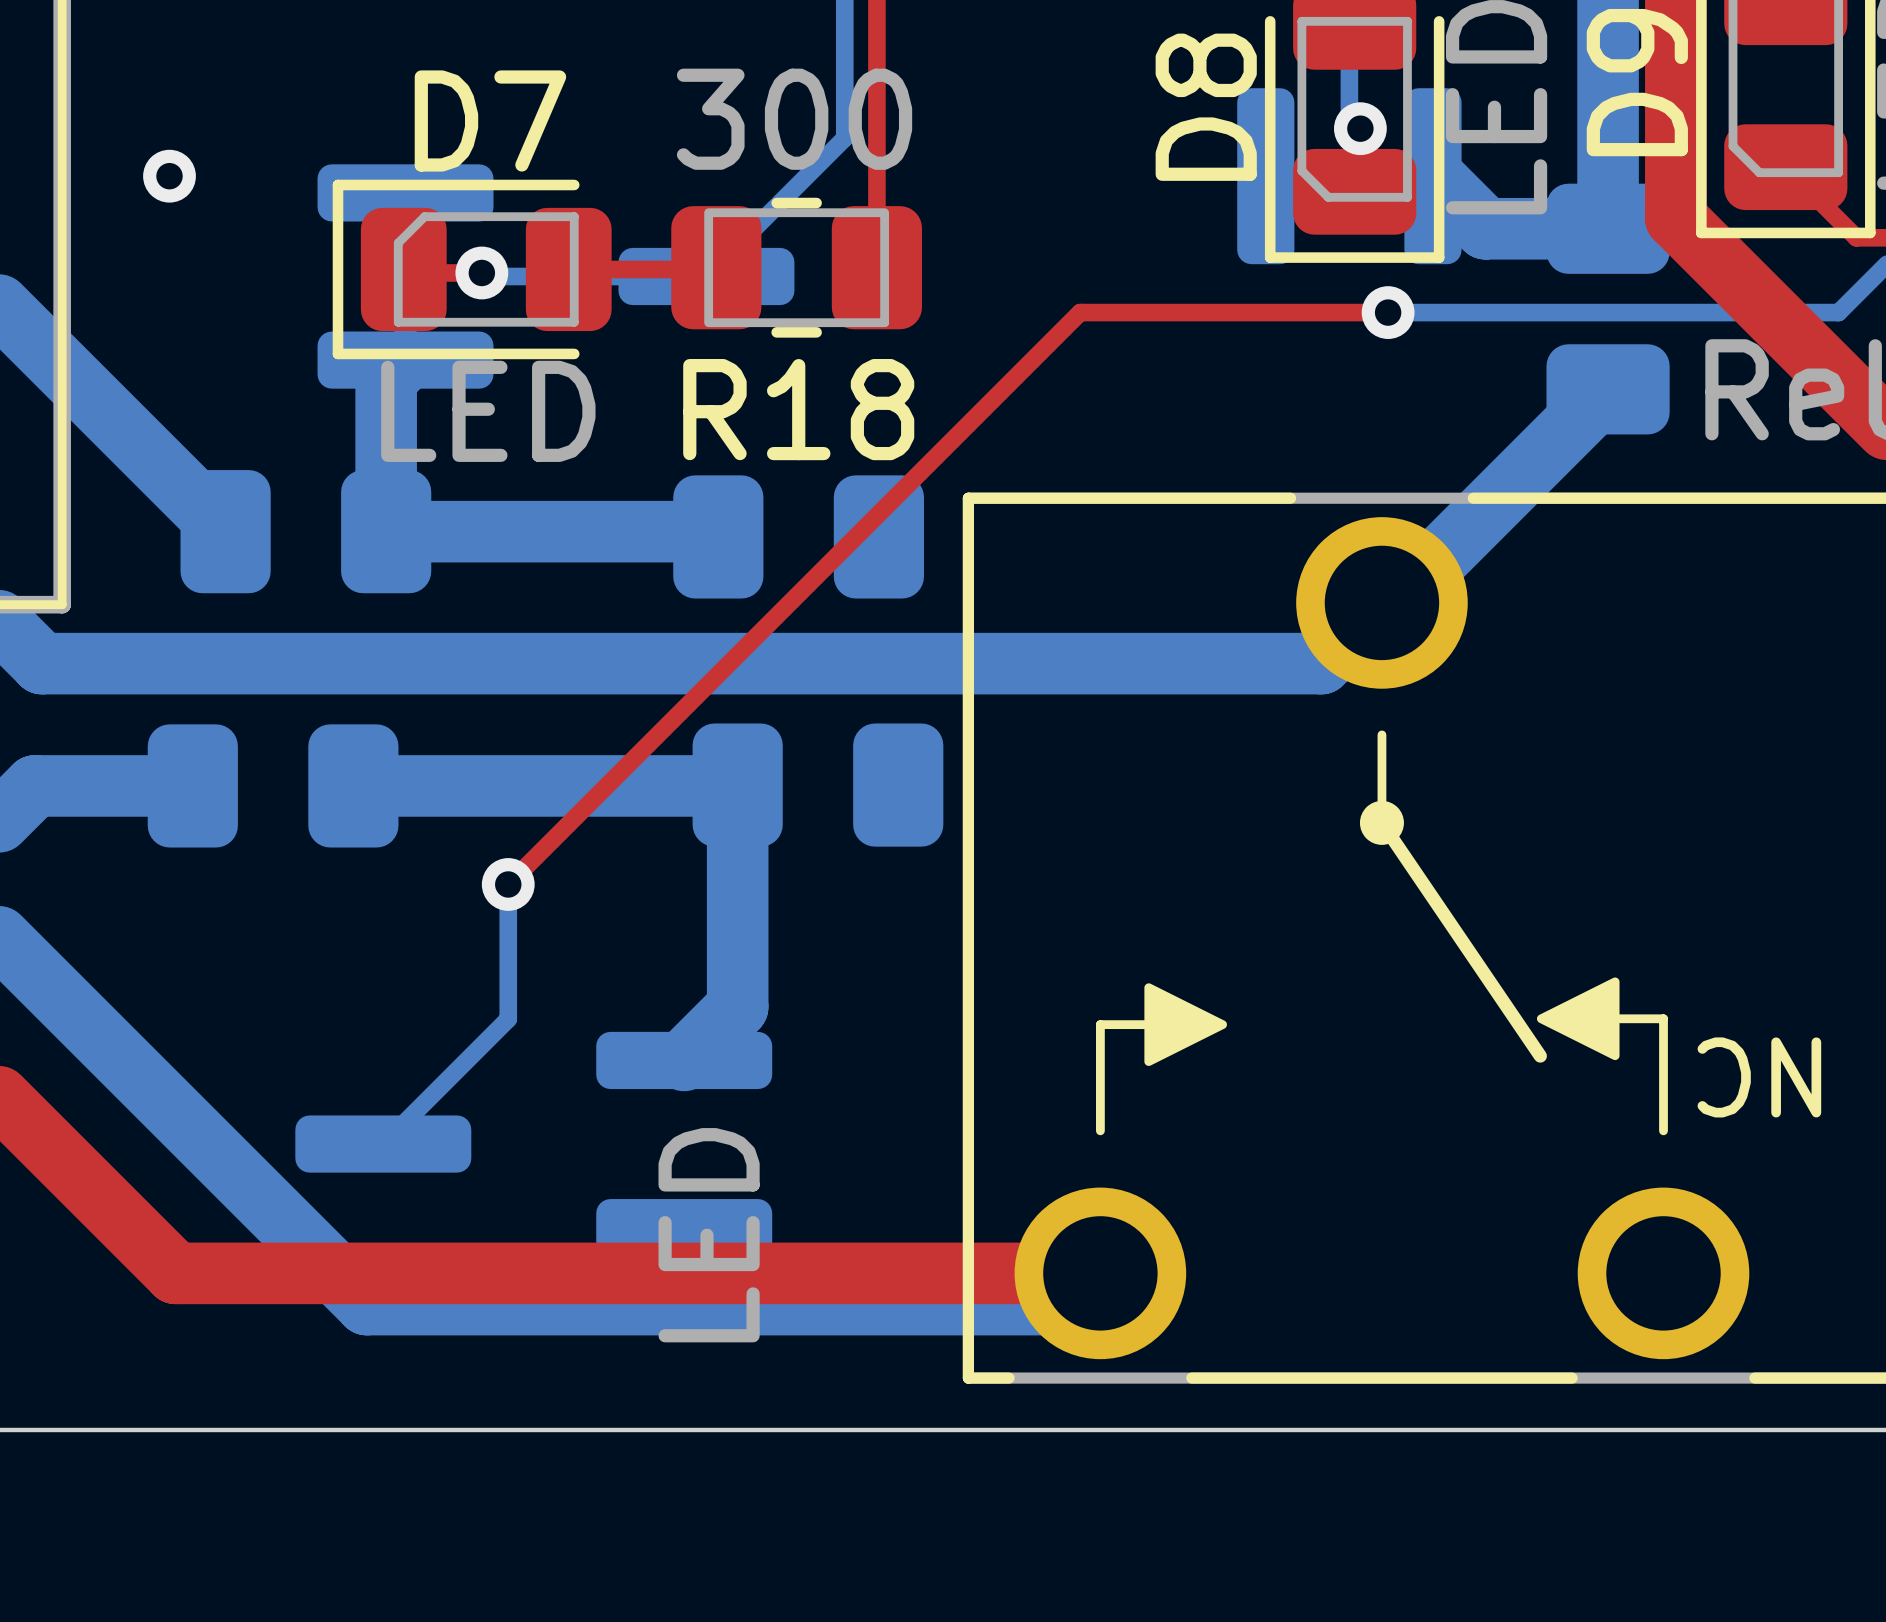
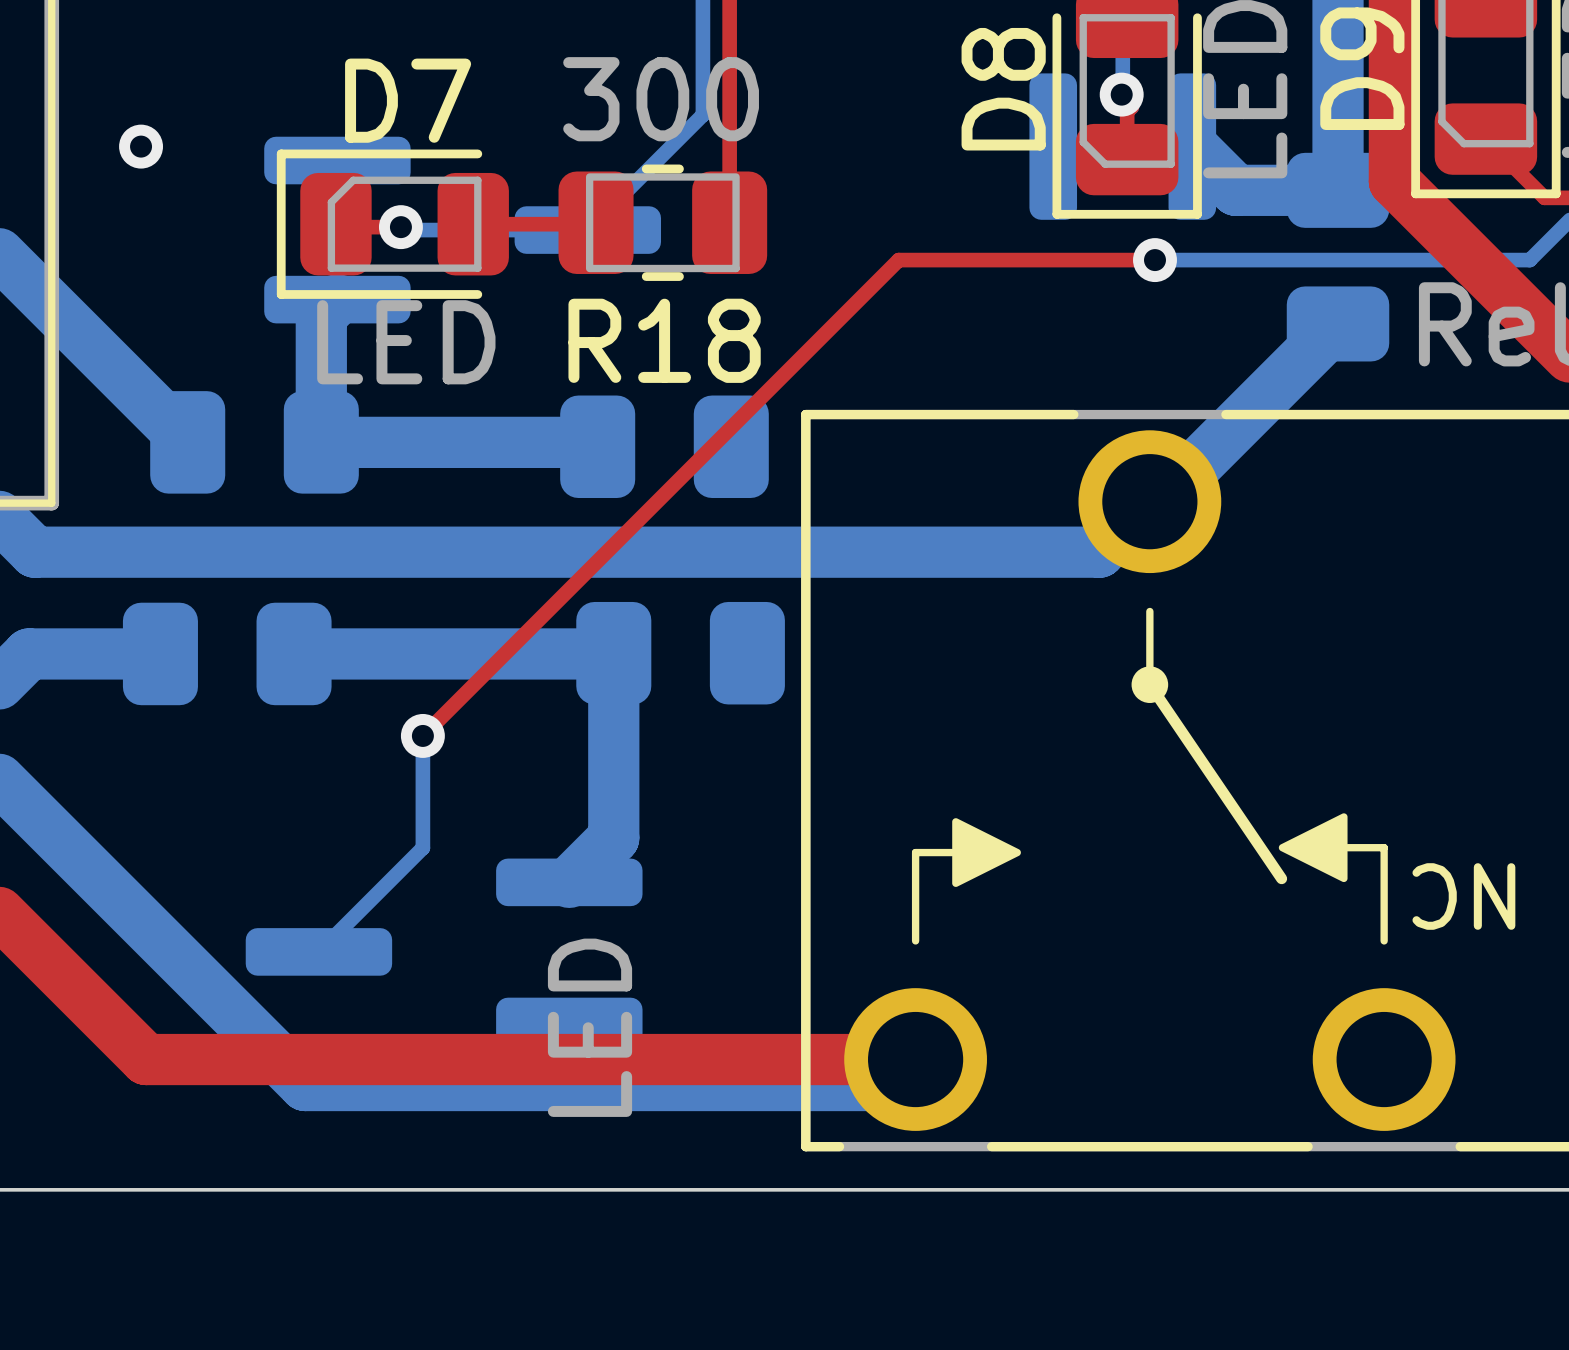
via position: (1360, 128) -> (1121, 94)

